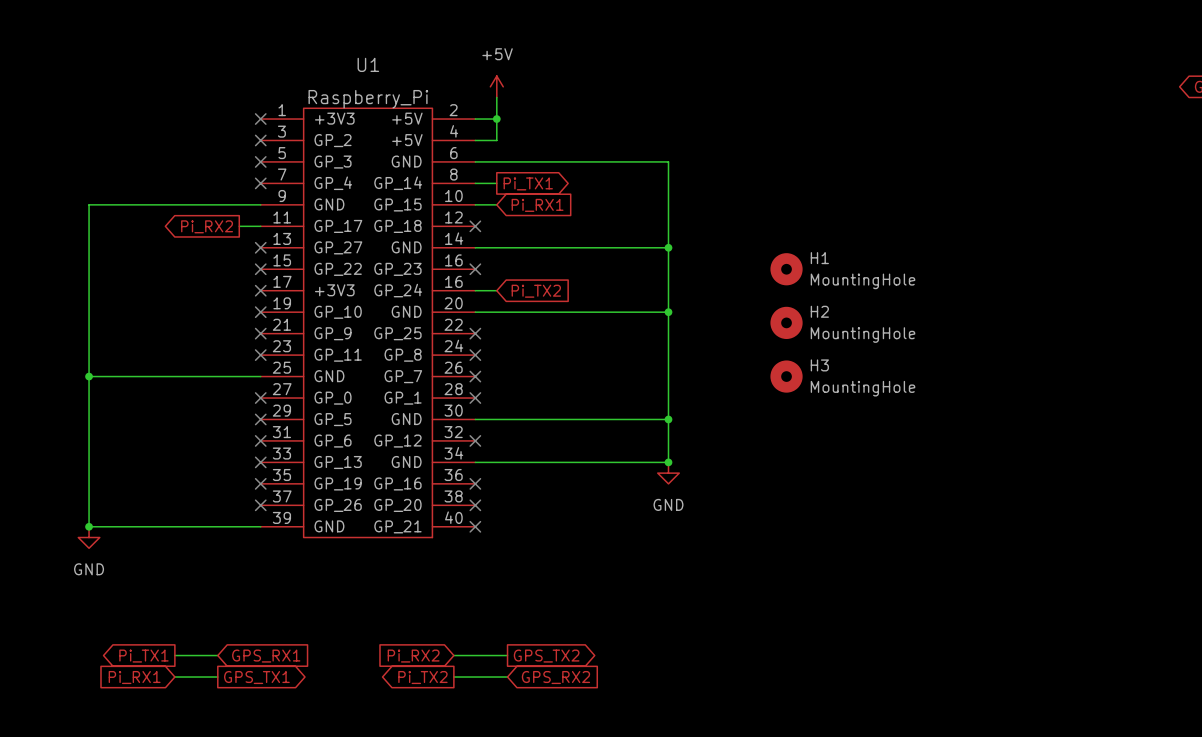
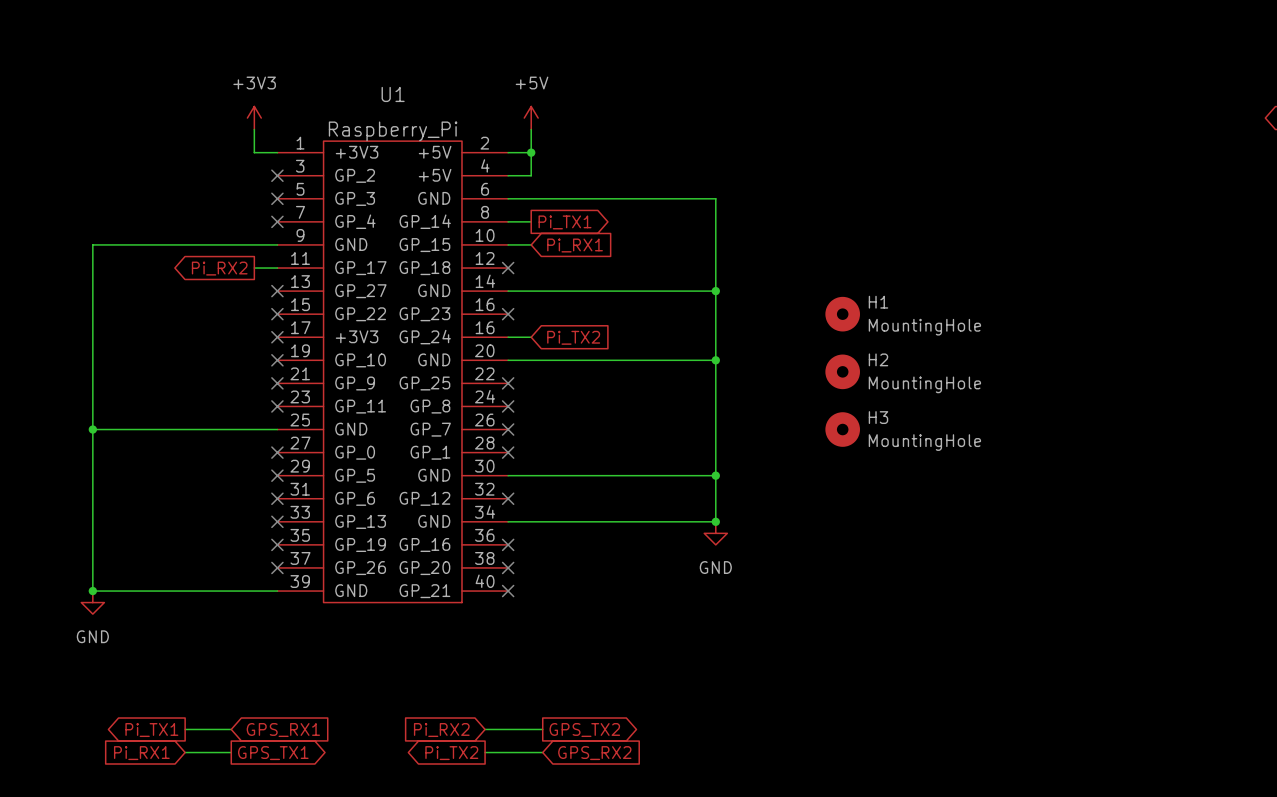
power symbol: none -> +3V3 (254, 118)
wire: none -> (254, 129) (254, 152) (277, 152)
no-connect mark: (260, 119) -> none

